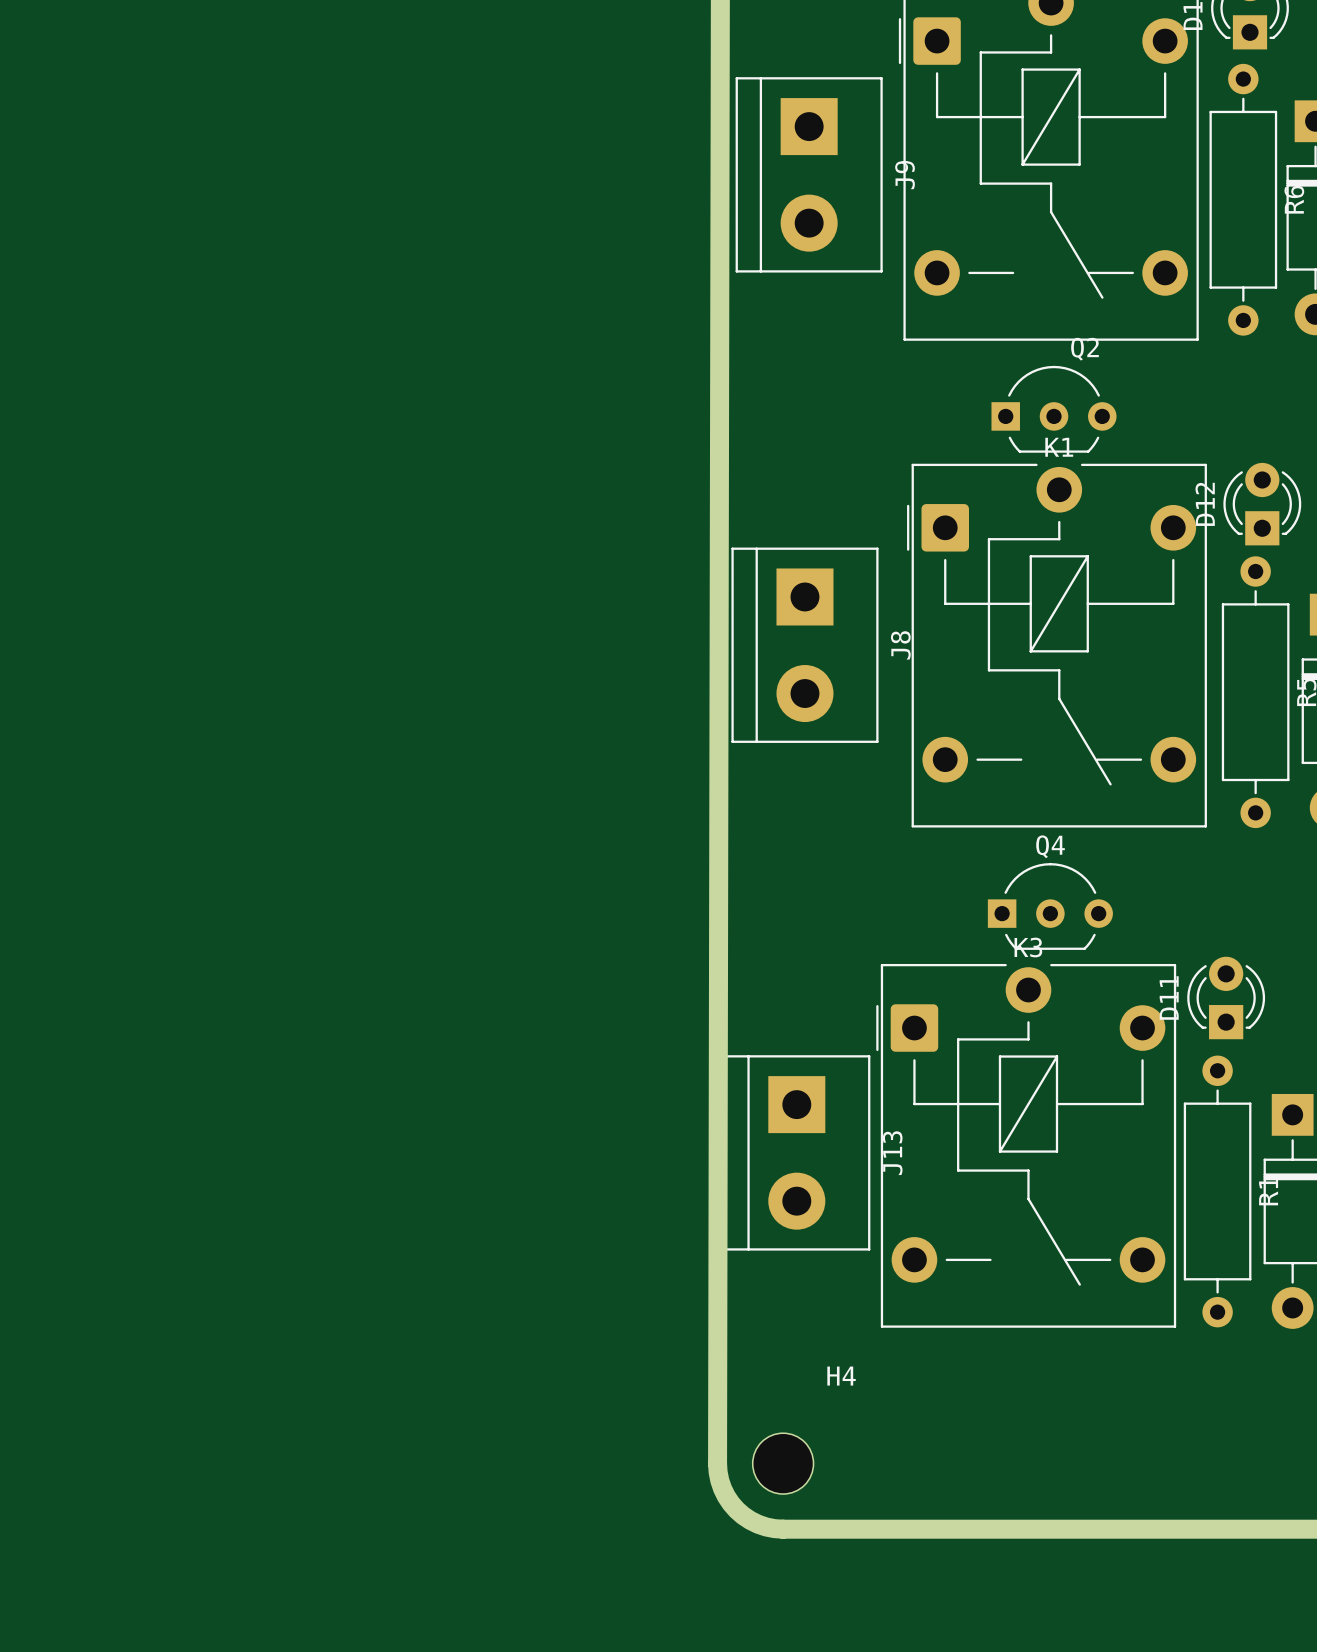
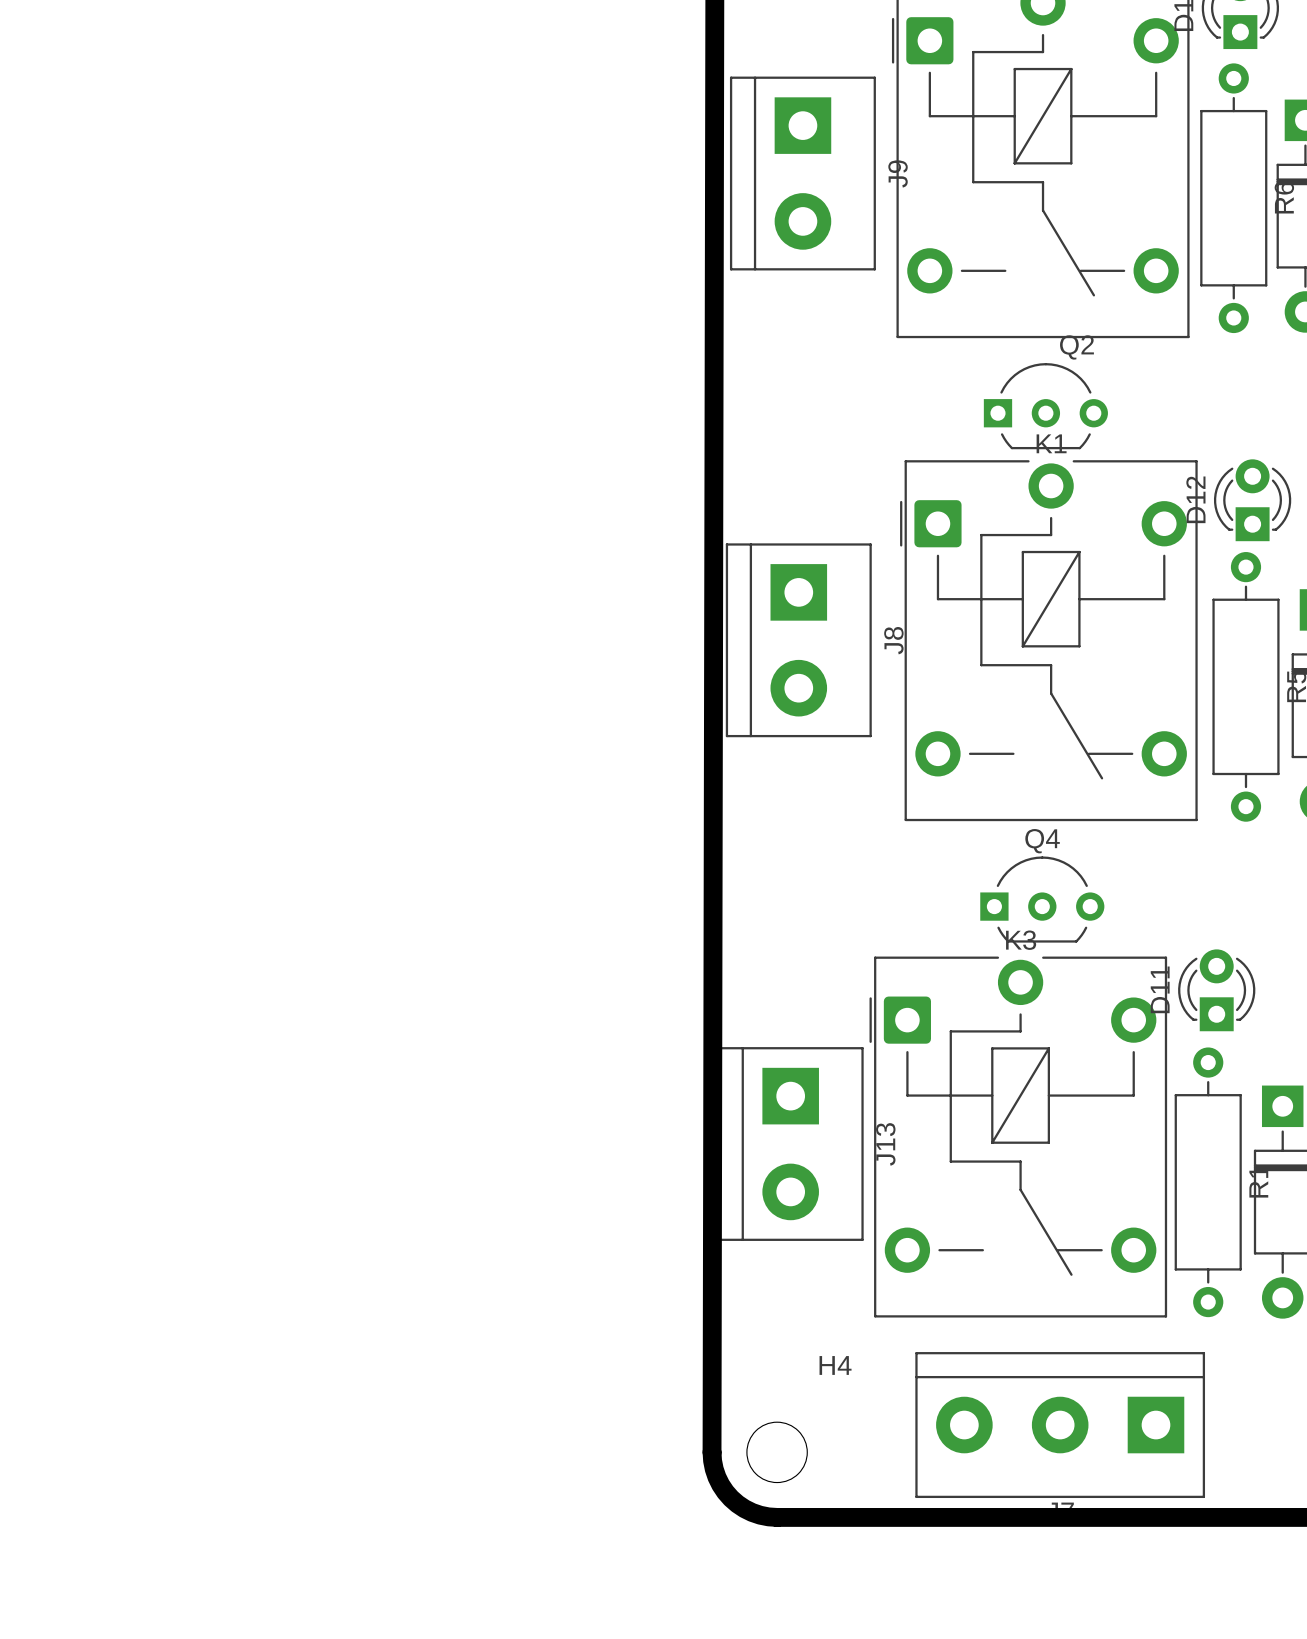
part: none -> (1060, 1425)

